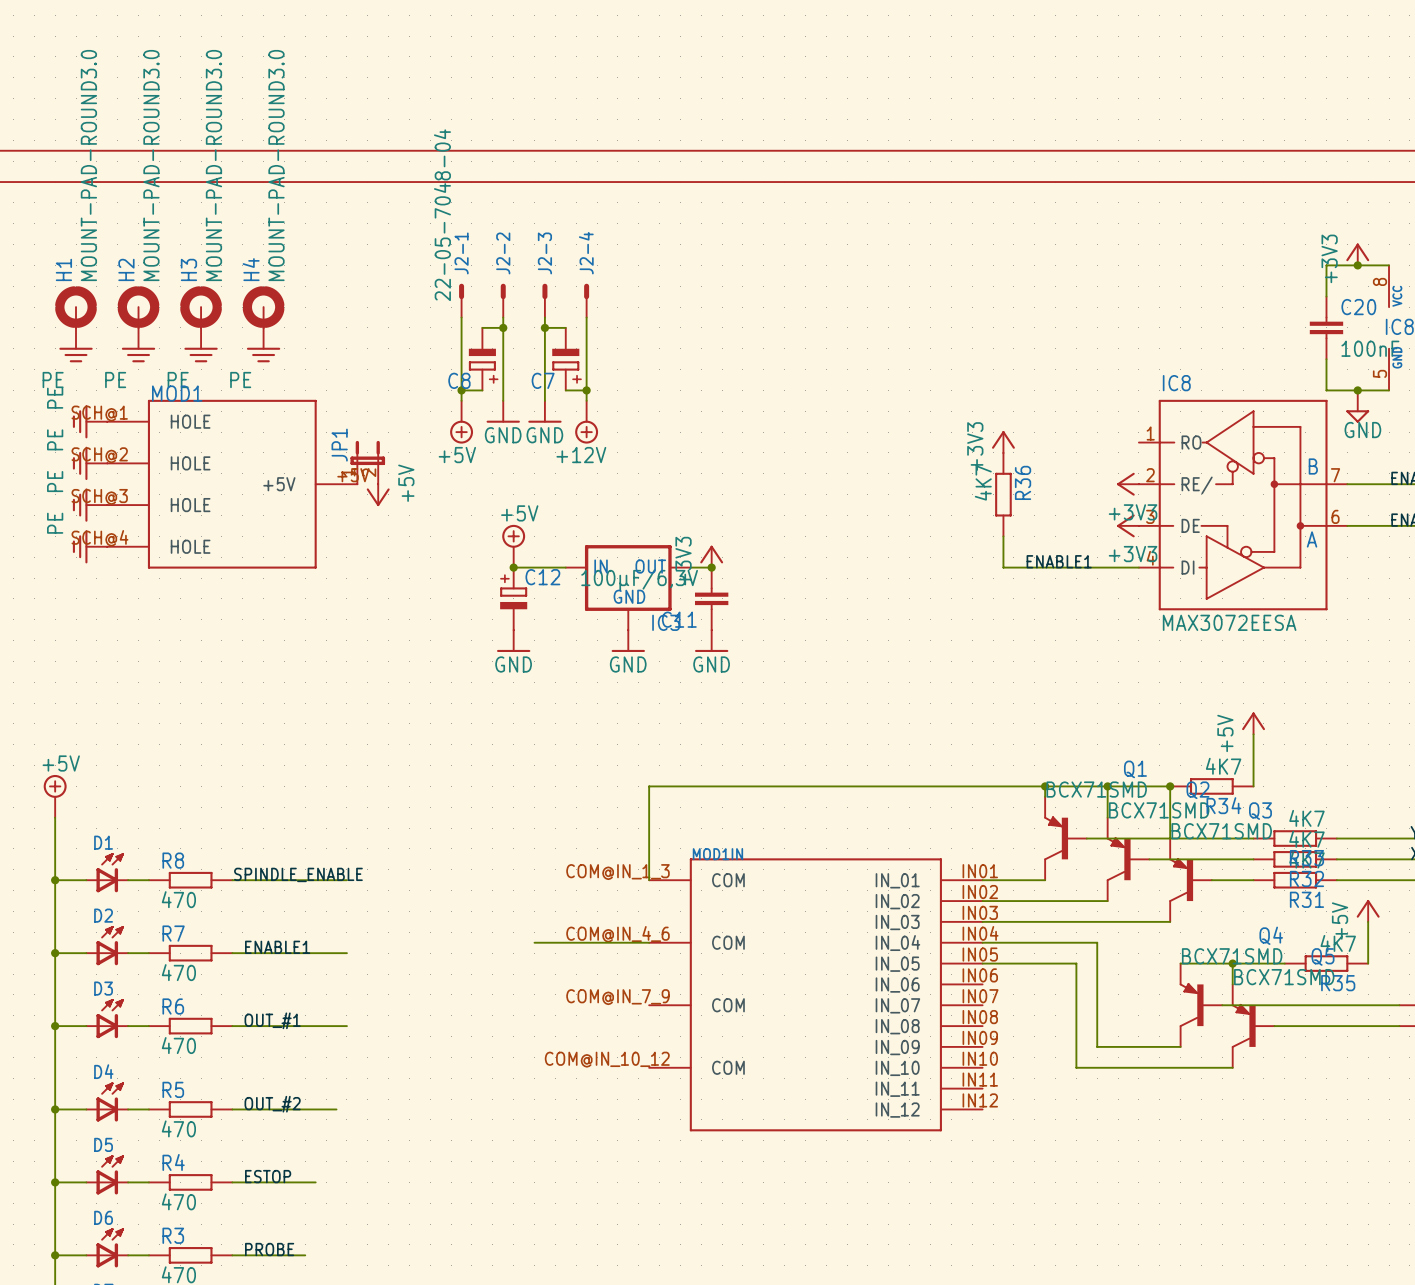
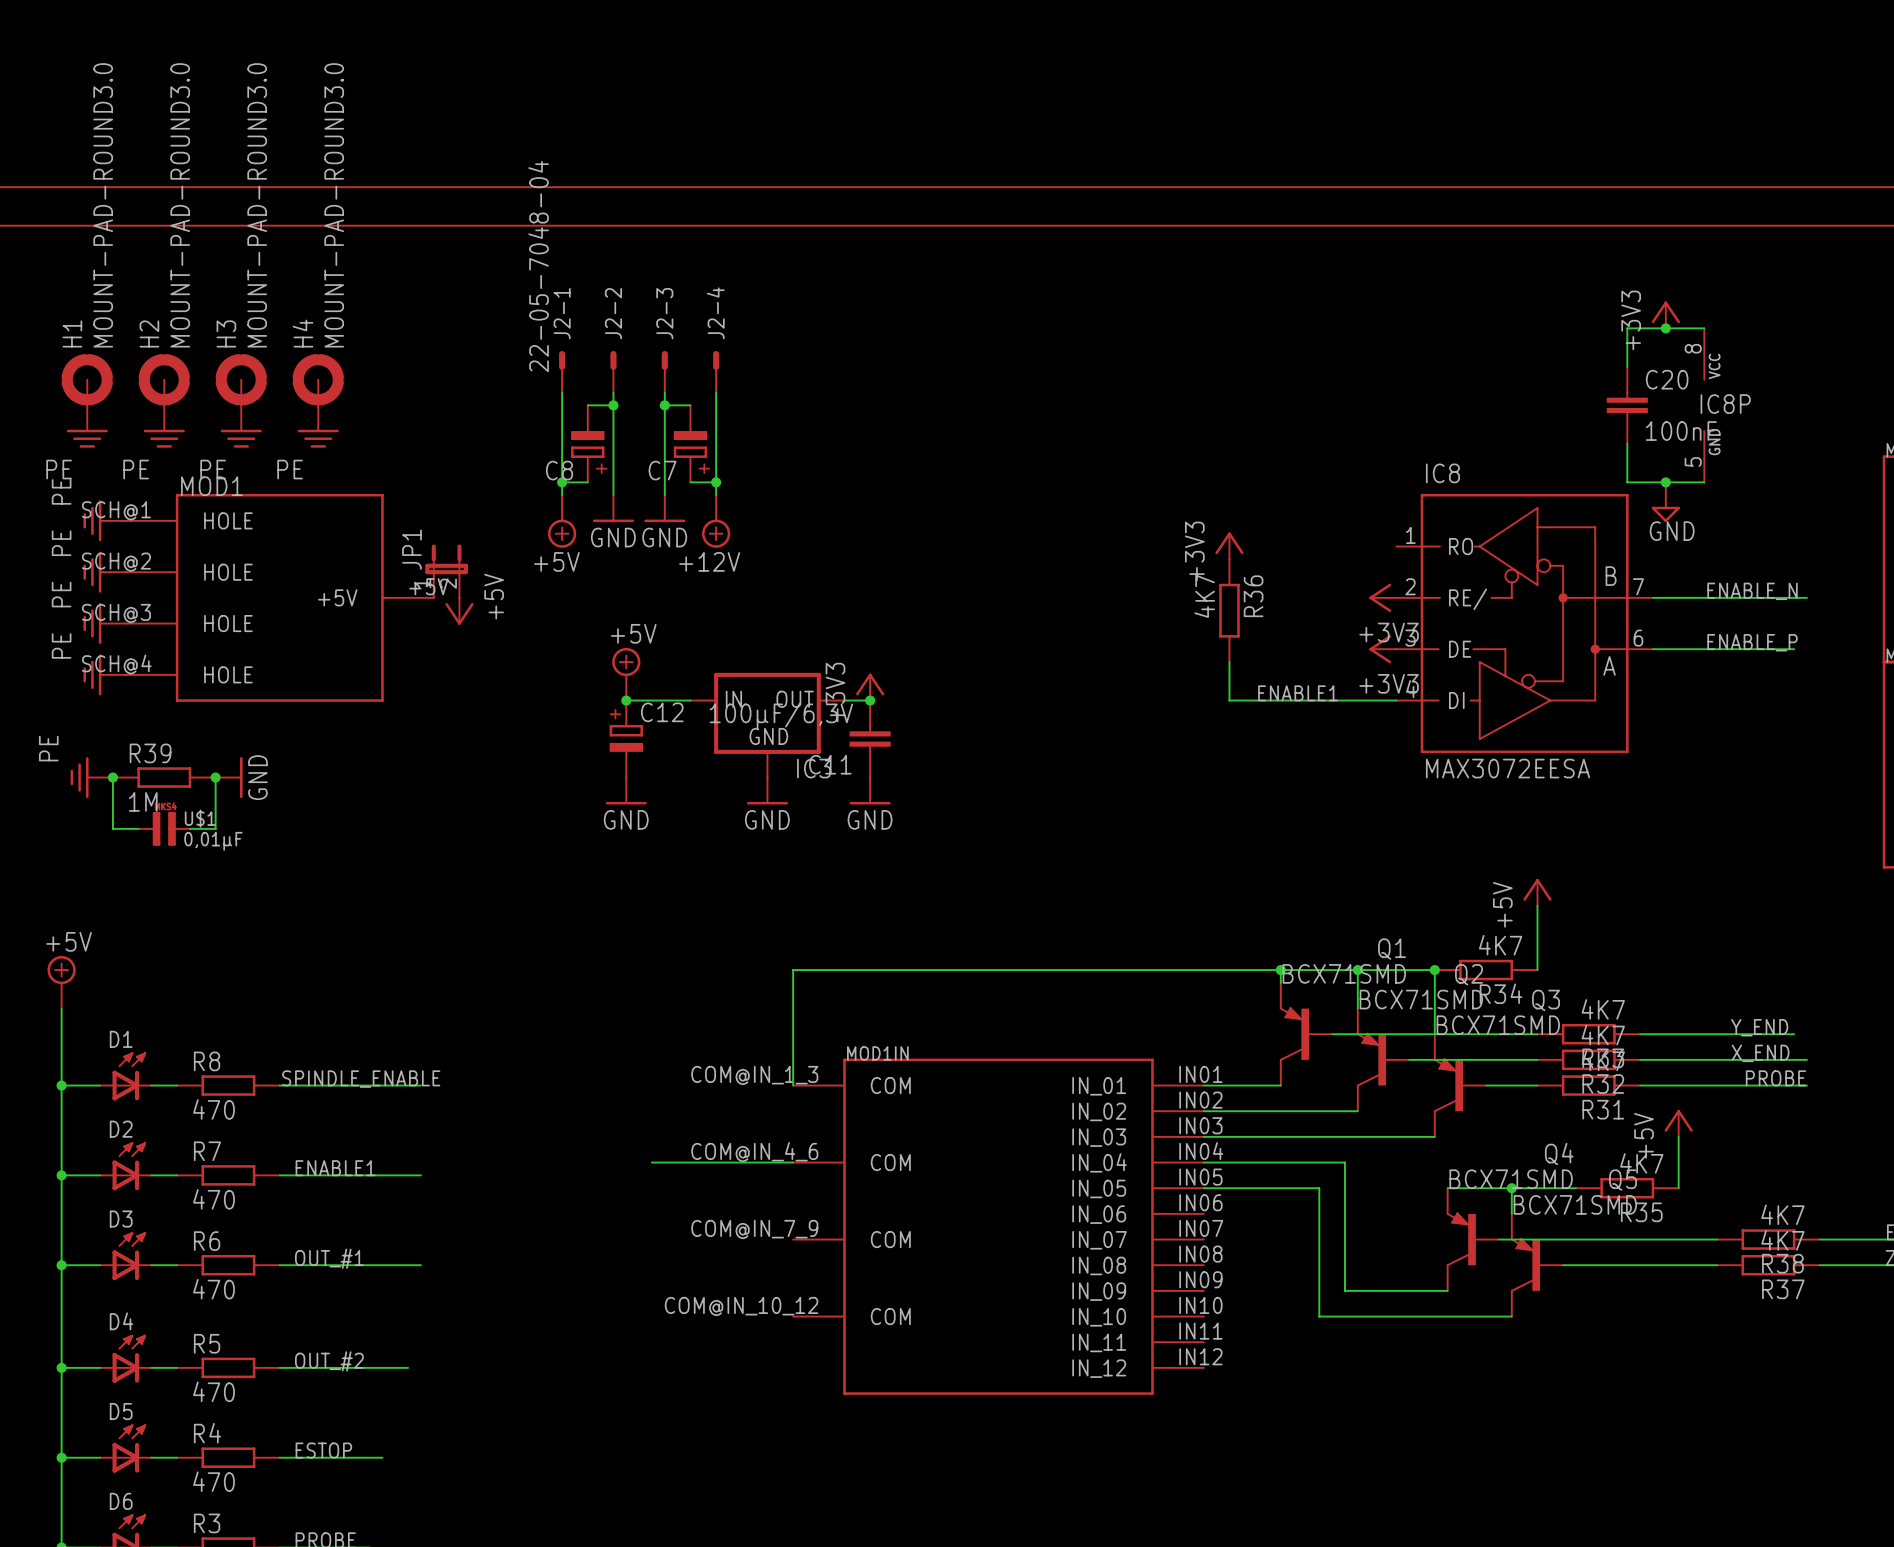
power symbol: none -> PE (91, 777)
wire: none -> (112, 777) (112, 828) (138, 828)
junction: none -> (112, 777)
R39: none -> 1M (164, 777)
wire: none -> (215, 777) (215, 828) (189, 828)
junction: none -> (215, 777)
power symbol: none -> GND (229, 777)
U$1: none -> 0,01µF (164, 828)

